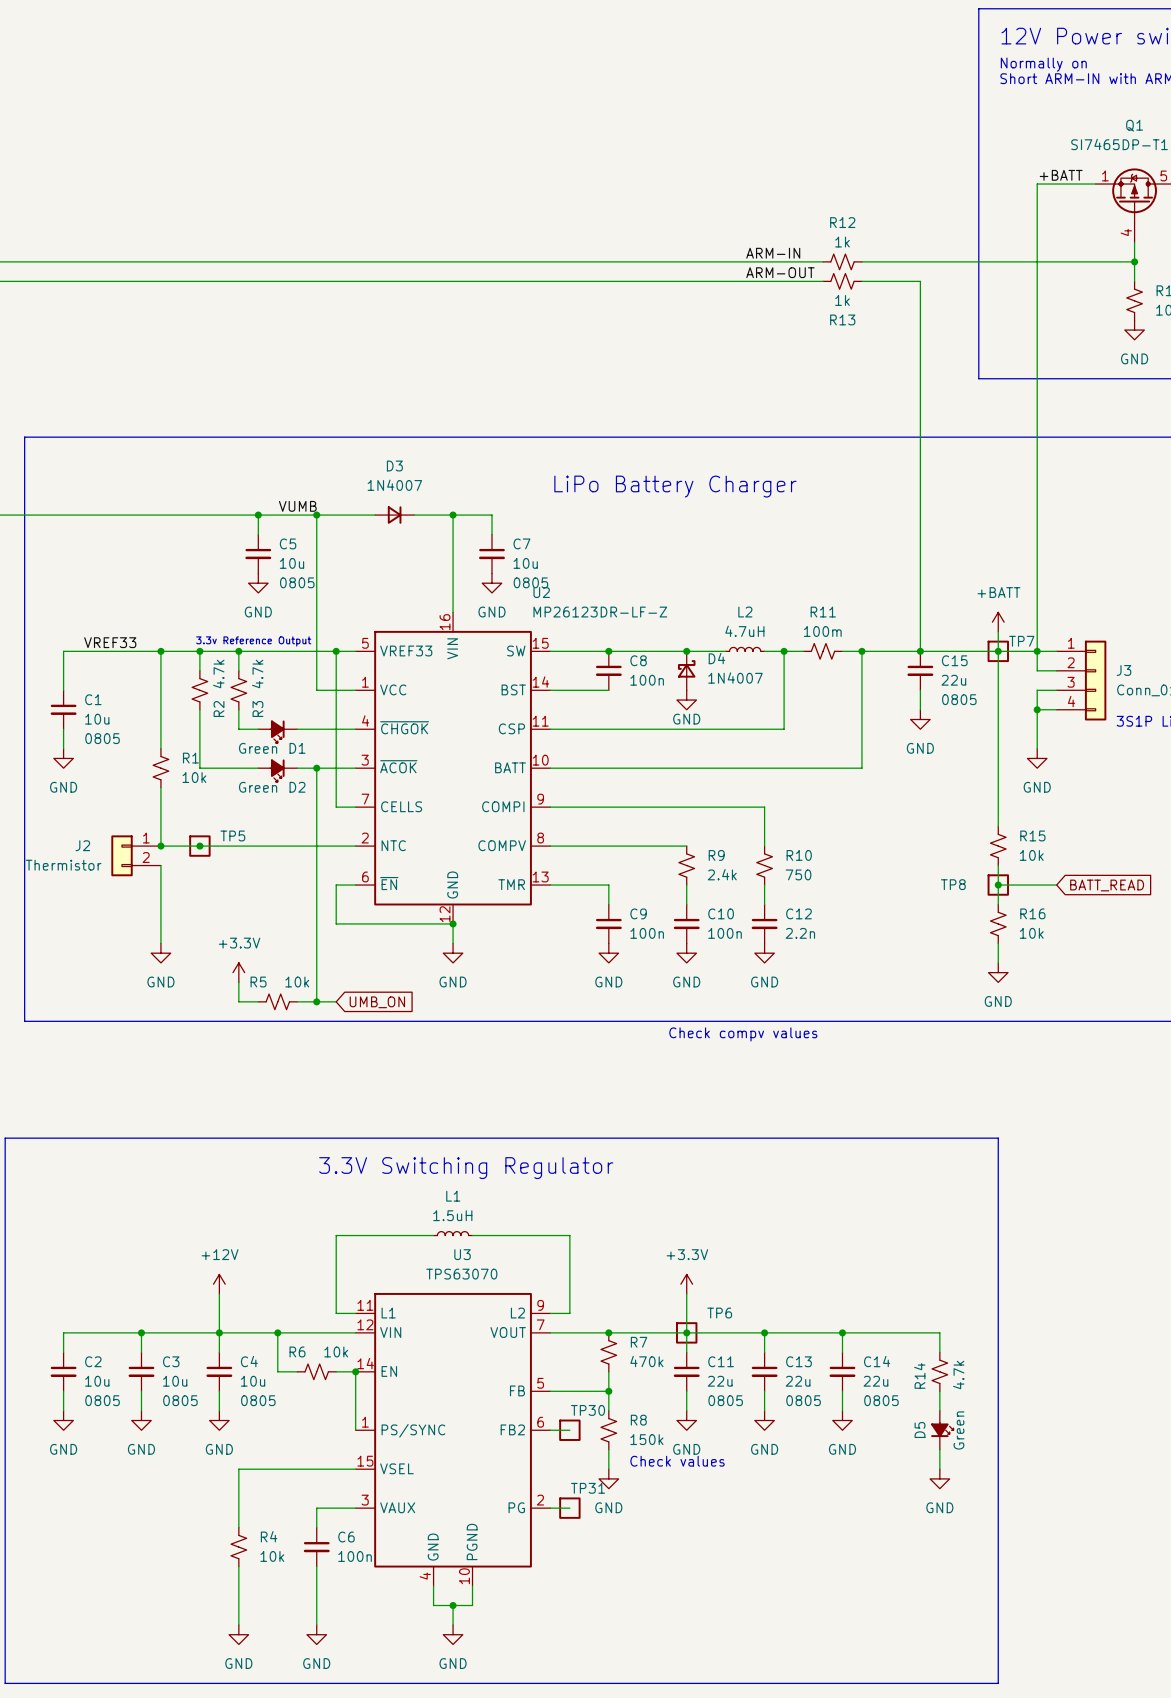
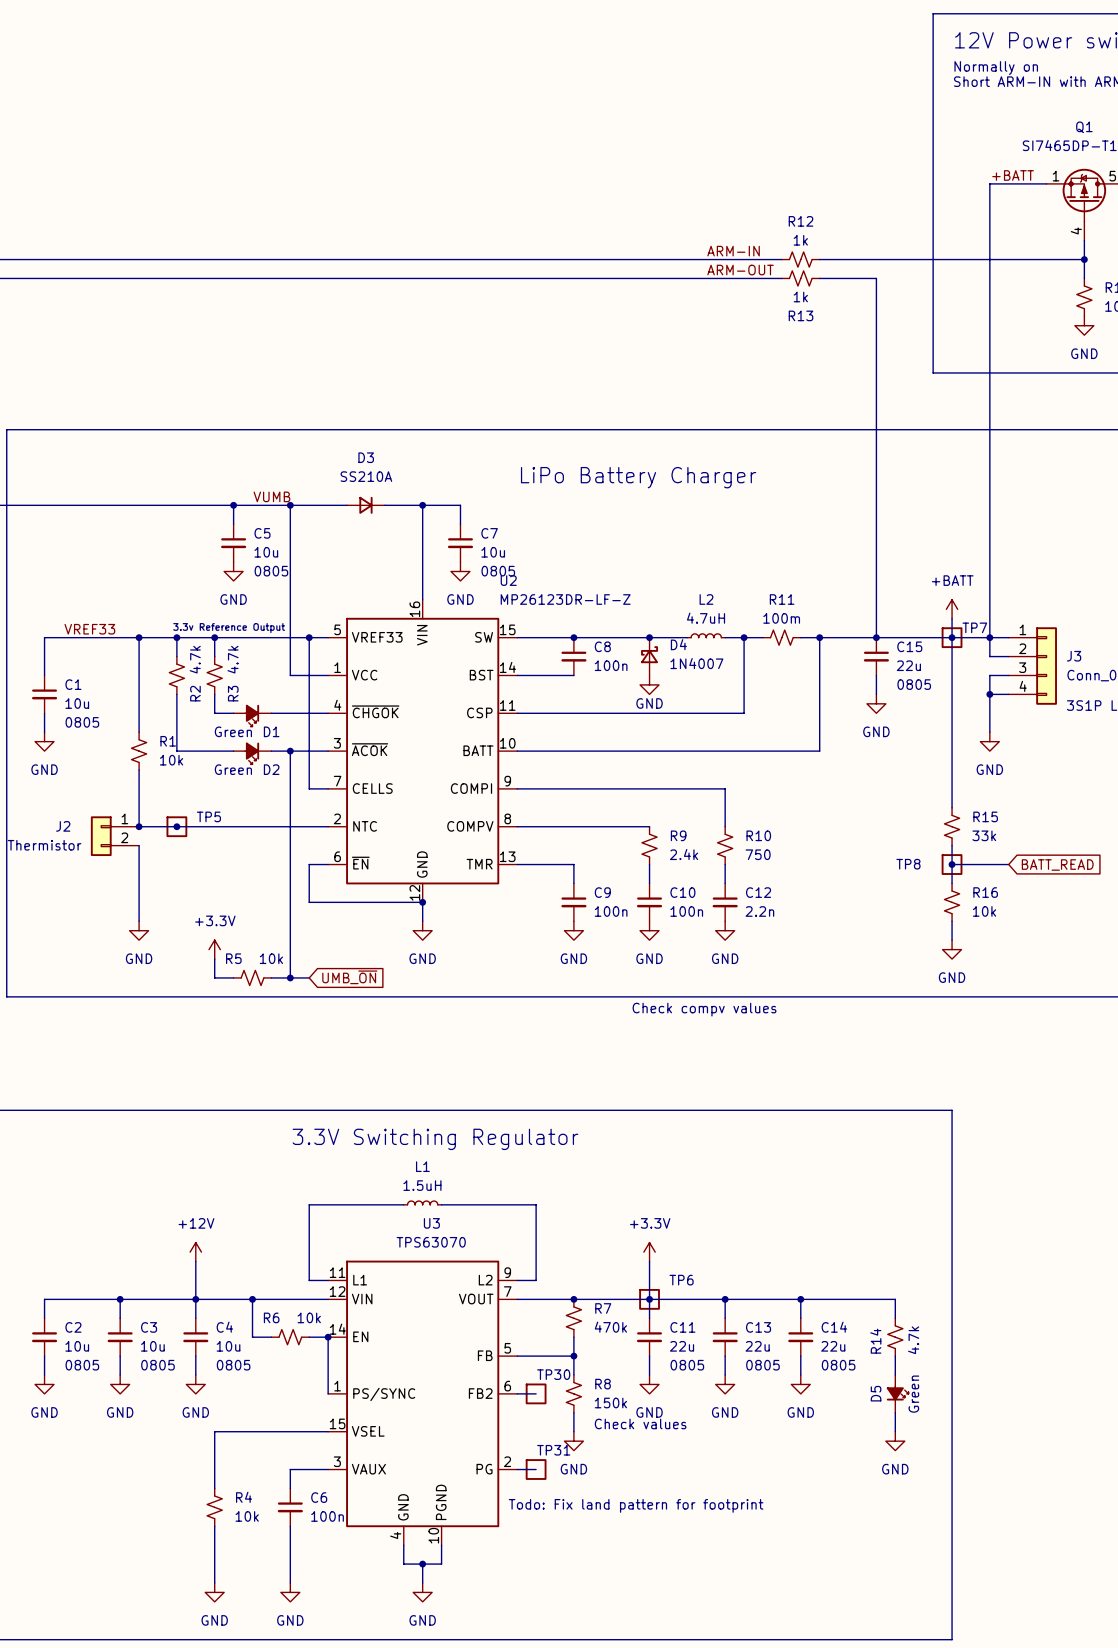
D3 value: 1N4007 (394, 485) -> SS210A (366, 476)
R15 value: 10k (1031, 855) -> 33k (984, 835)
global label: UMB_ON (377, 1002) -> UMB_~{ON} (349, 977)
text: none -> Todo: Fix land pattern for footprint (636, 1505)

